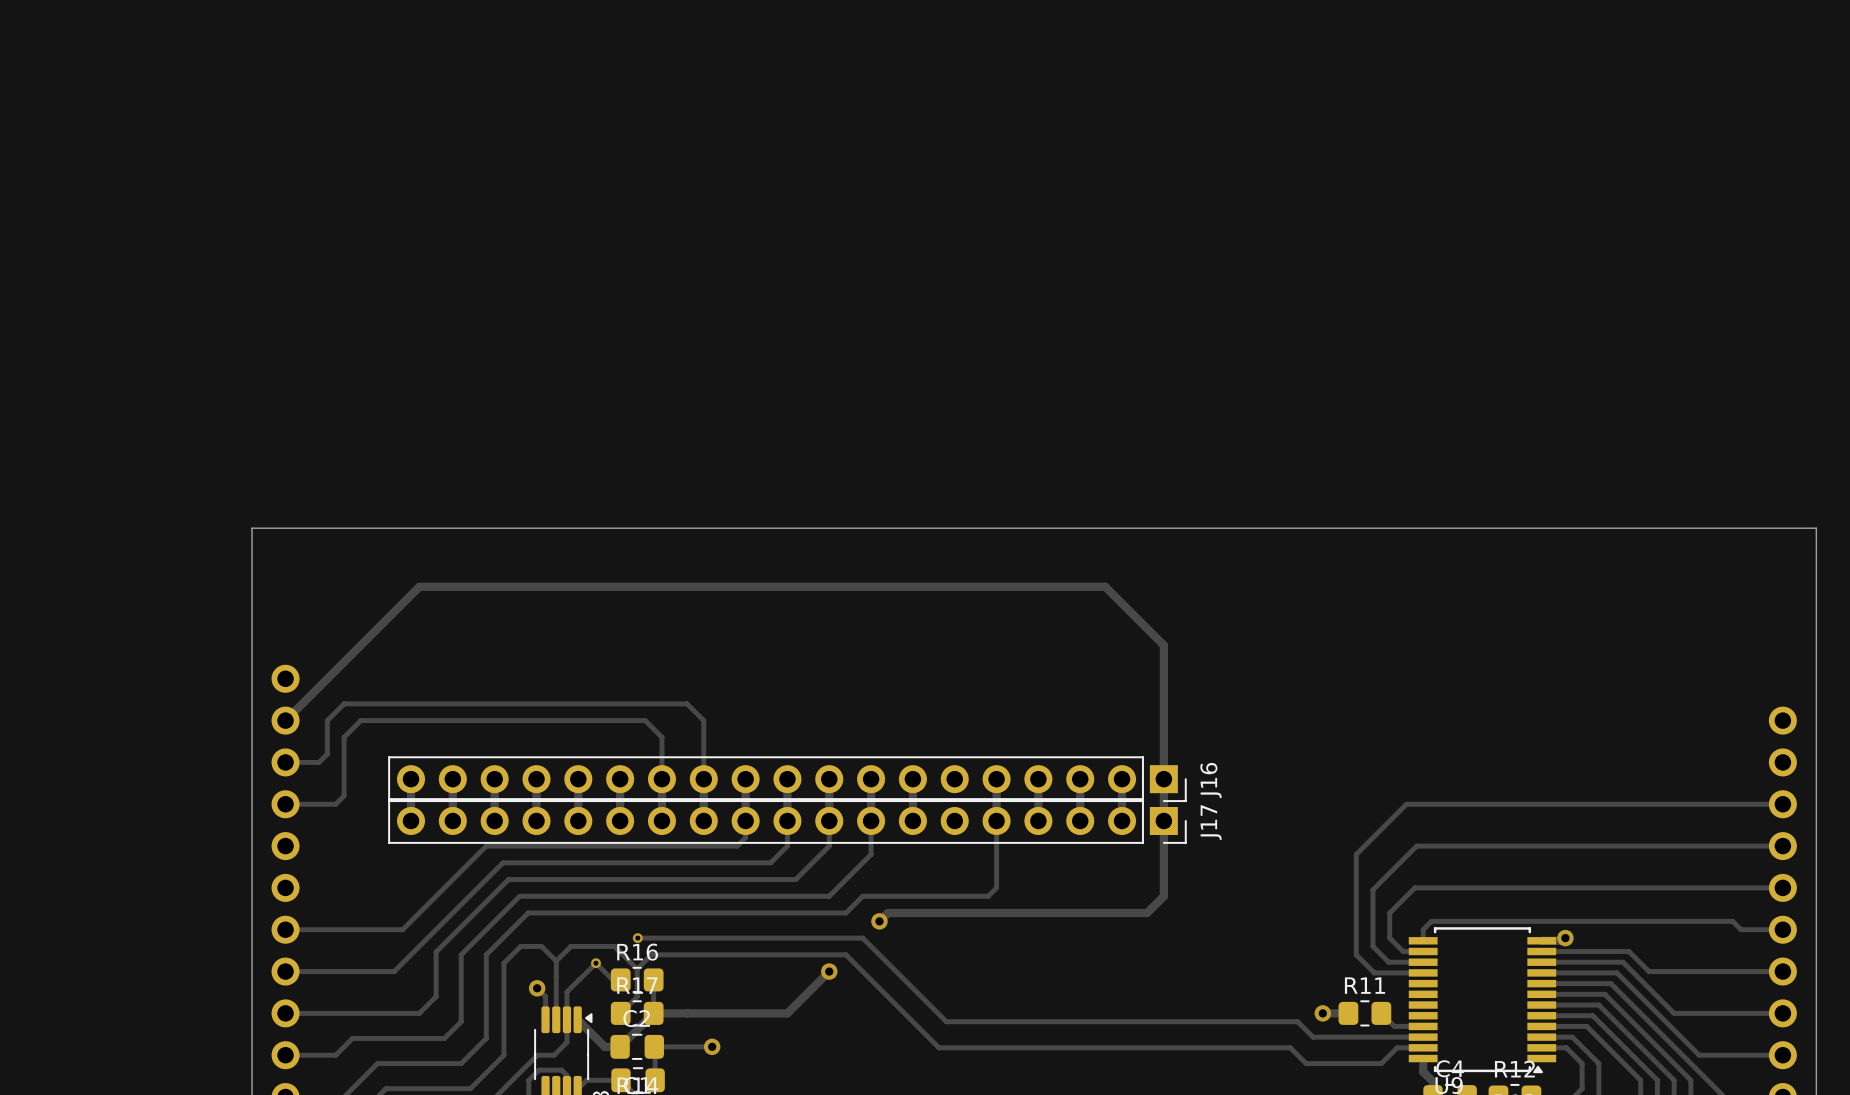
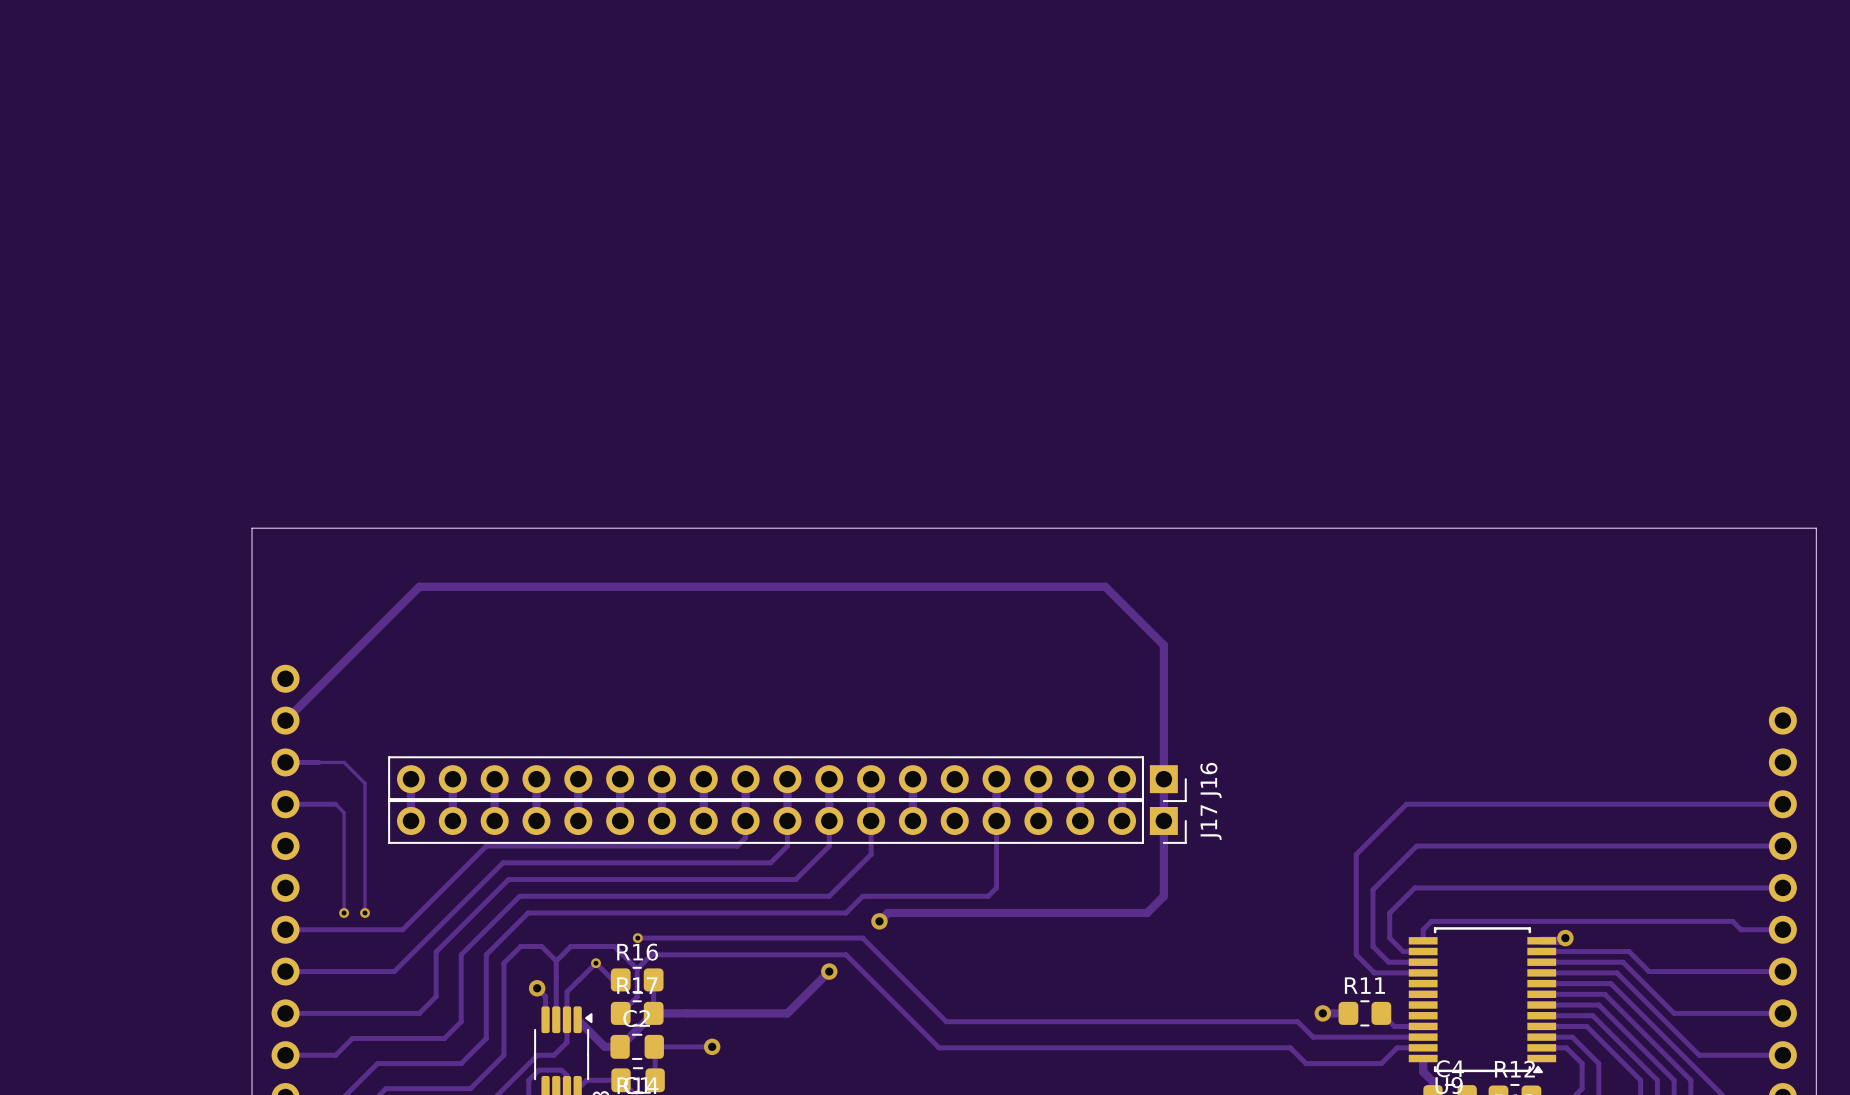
track: (319, 762) (327, 754) (327, 720) (344, 703) (687, 703) (703, 720) (703, 779) -> (319, 762) (344, 762) (365, 783) (365, 913)
track: (661, 779) (661, 737) (645, 720) (360, 720) (344, 737) (344, 795) (335, 804) -> (344, 913) (344, 812) (335, 804)
via: none -> (344, 913)
via: none -> (365, 913)

